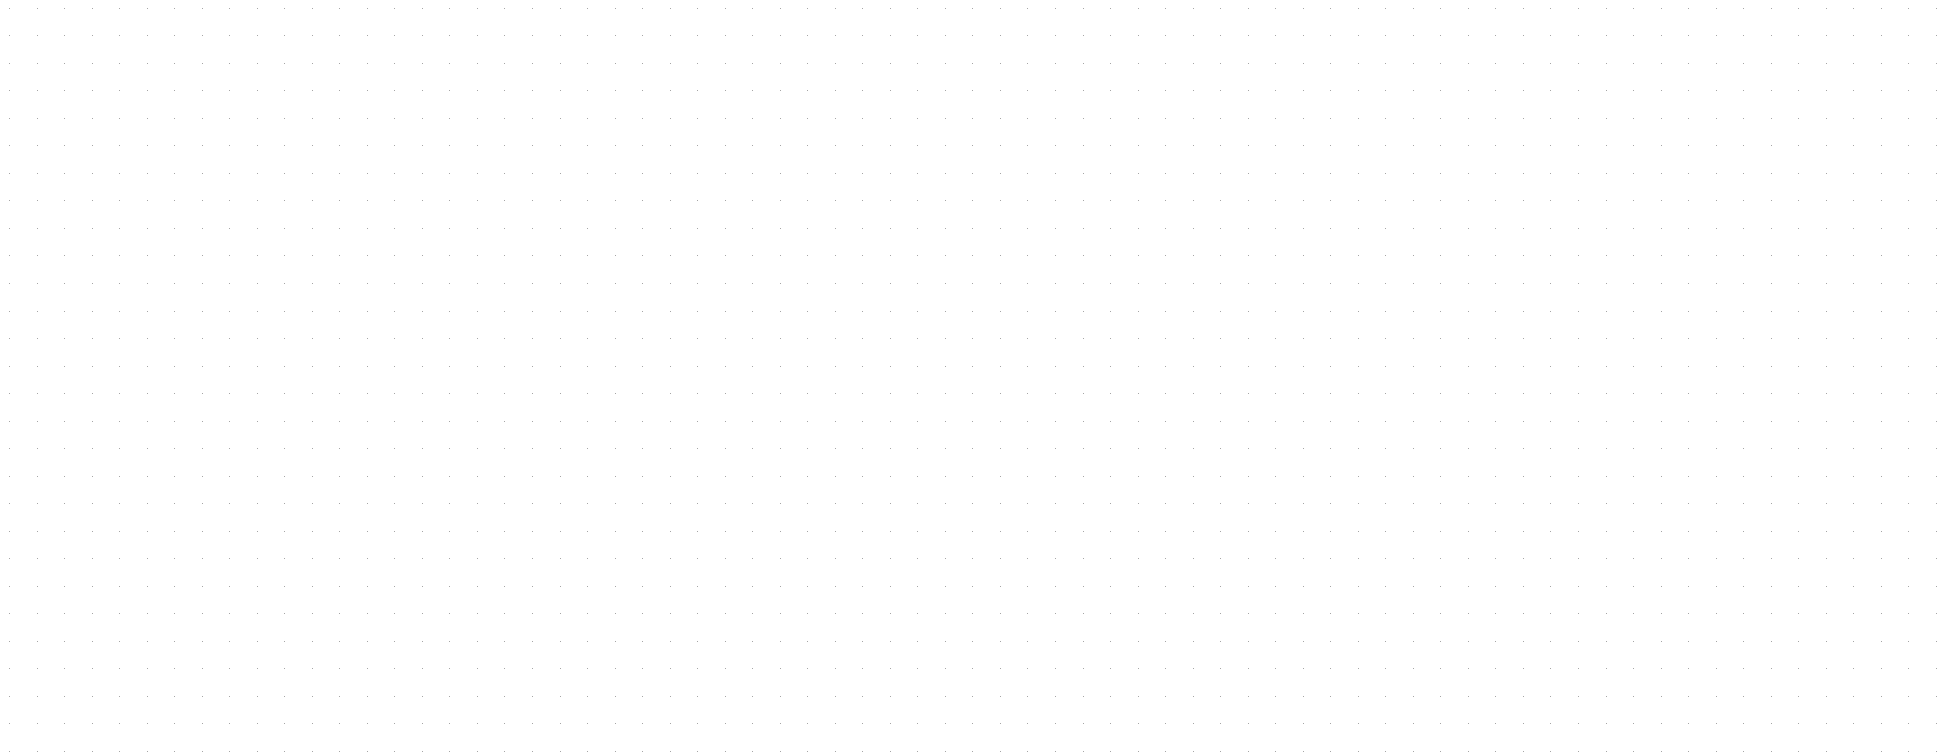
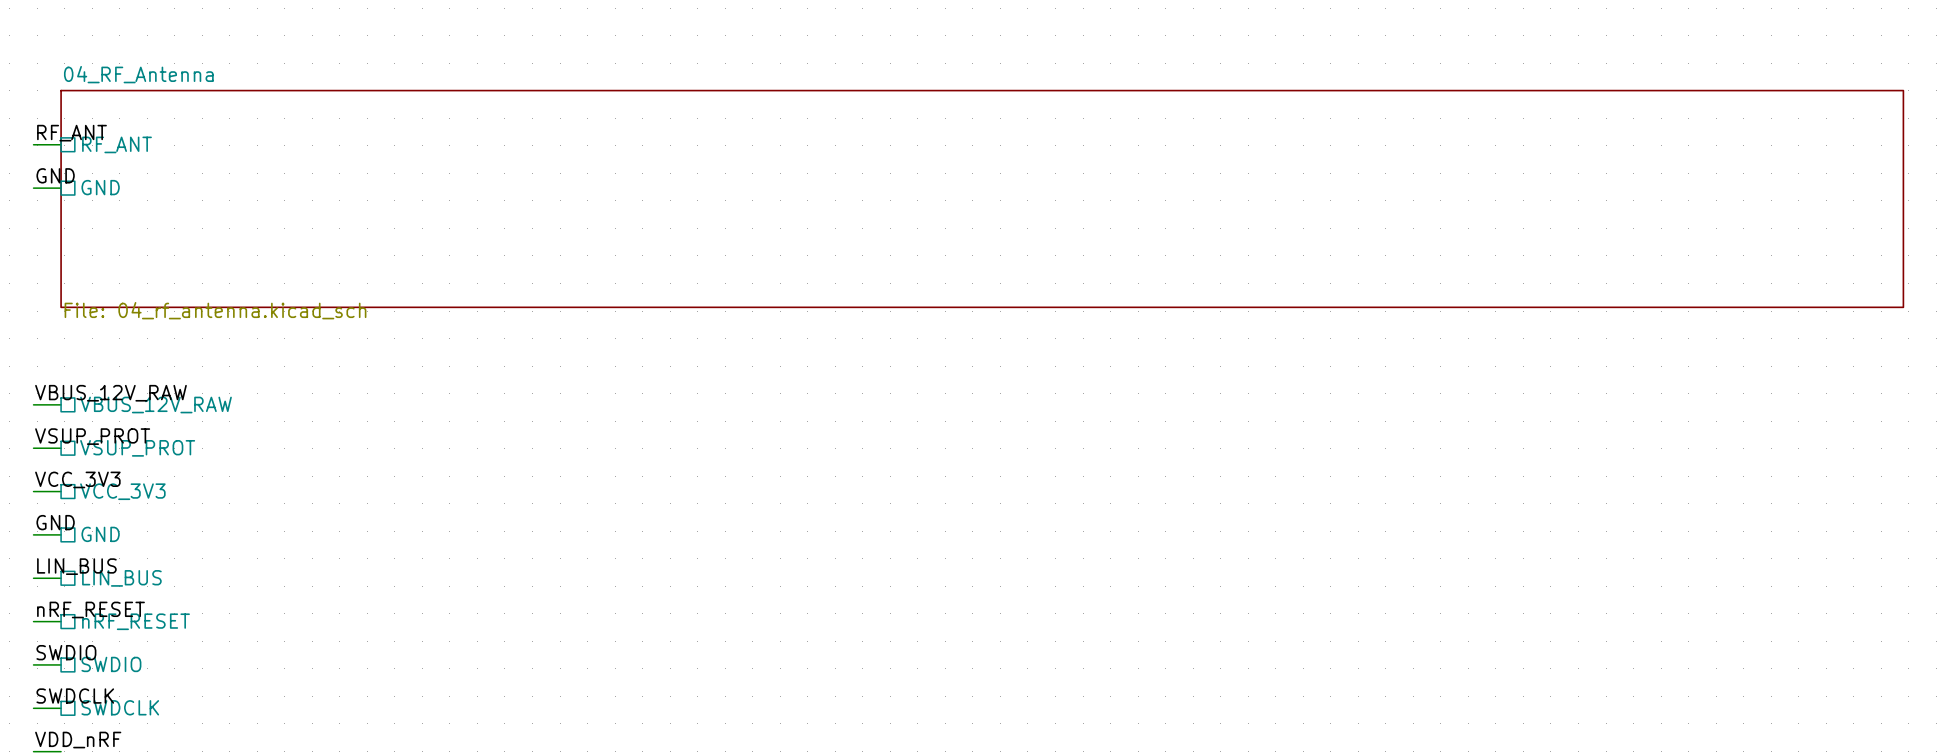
label: none -> RF_ANT (71, 133)
wire: none -> (33, 144) (61, 144)
sheet pin: none -> RF_ANT (116, 144)
label: none -> GND (55, 175)
sheet pin: none -> GND (100, 187)
wire: none -> (33, 188) (61, 188)
sheet 04_RF_Antenna: none -> File: 04_rf_antenna.kicad_sch (982, 198)
label: none -> VBUS_12V_RAW (110, 393)
wire: none -> (33, 404) (61, 404)
sheet pin: none -> VBUS_12V_RAW (155, 405)
label: none -> VSUP_PROT (92, 436)
wire: none -> (33, 448) (61, 448)
sheet pin: none -> VSUP_PROT (137, 448)
label: none -> VCC_3V3 (77, 479)
wire: none -> (33, 491) (61, 491)
sheet pin: none -> VCC_3V3 (122, 491)
label: none -> GND (55, 522)
wire: none -> (33, 534) (61, 534)
sheet pin: none -> GND (100, 534)
label: none -> LIN_BUS (76, 566)
wire: none -> (33, 578) (61, 578)
sheet pin: none -> LIN_BUS (121, 578)
label: none -> nRF_RESET (90, 609)
wire: none -> (33, 621) (61, 621)
sheet pin: none -> nRF_RESET (136, 621)
label: none -> SWDIO (66, 652)
wire: none -> (33, 664) (61, 664)
sheet pin: none -> SWDIO (111, 664)
label: none -> SWDCLK (75, 696)
sheet pin: none -> SWDCLK (120, 707)
wire: none -> (33, 708) (61, 708)
label: none -> VDD_nRF (78, 740)
wire: none -> (33, 751) (61, 751)

